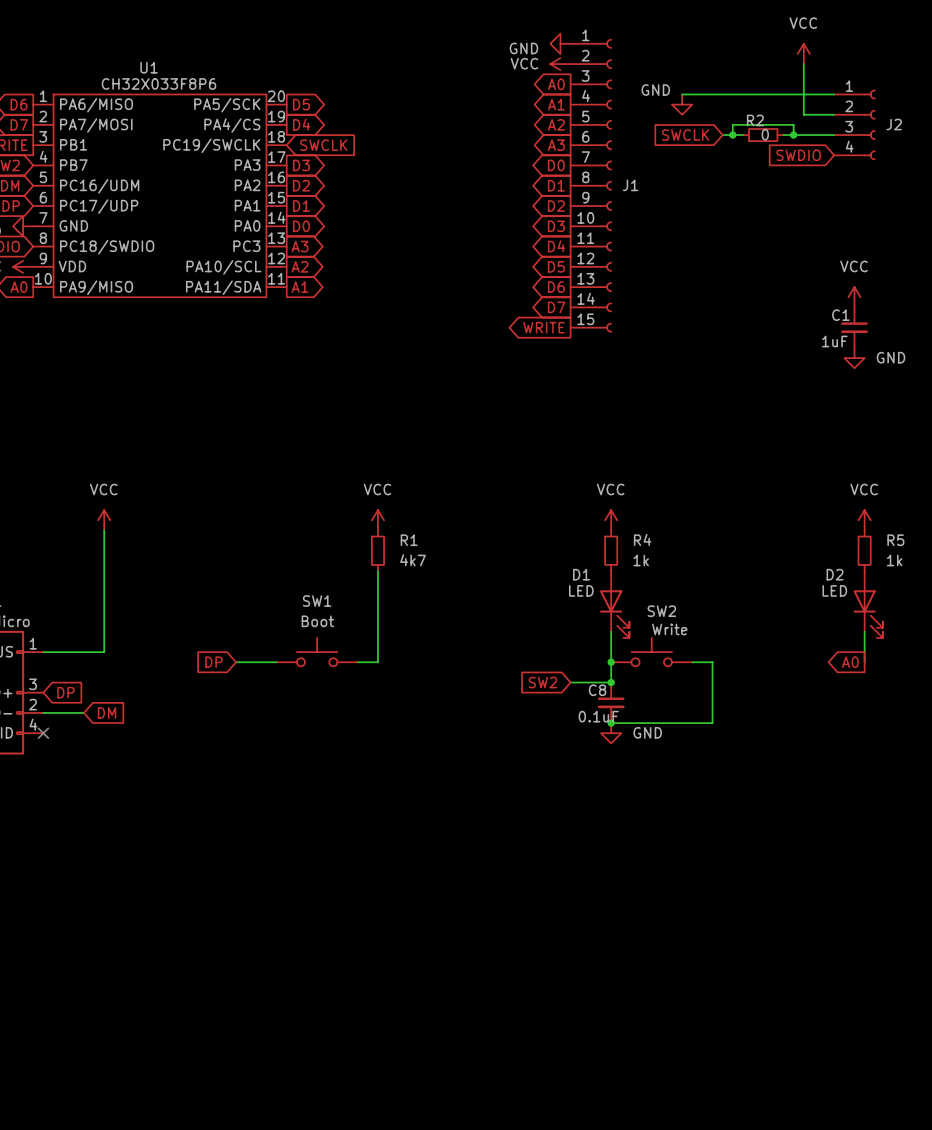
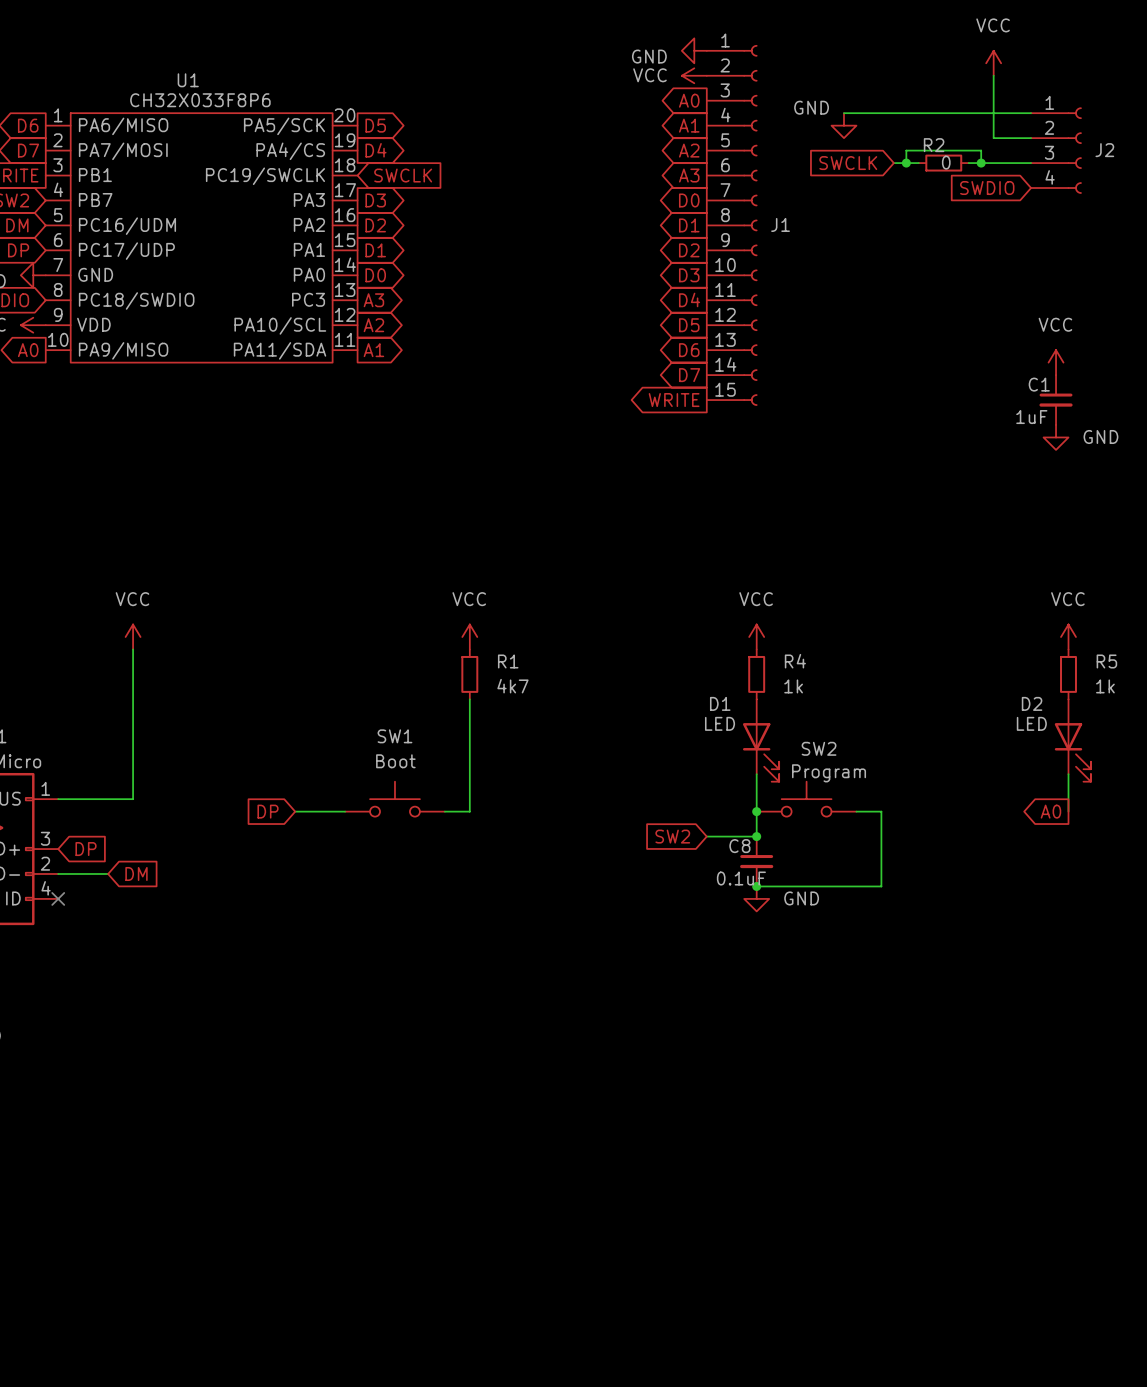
SW2 value: Write (669, 629) -> Program (829, 773)

